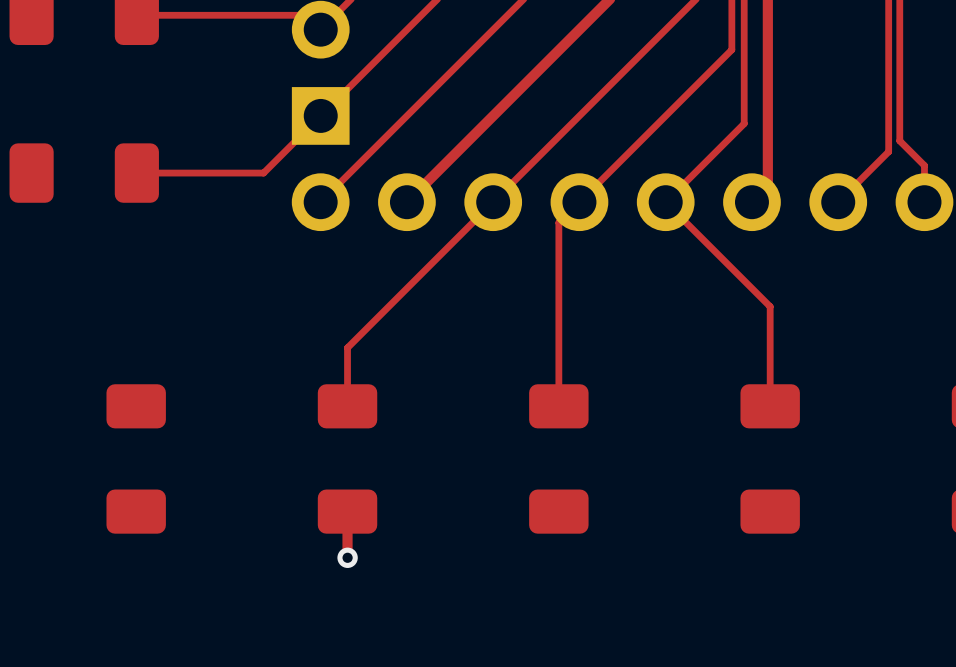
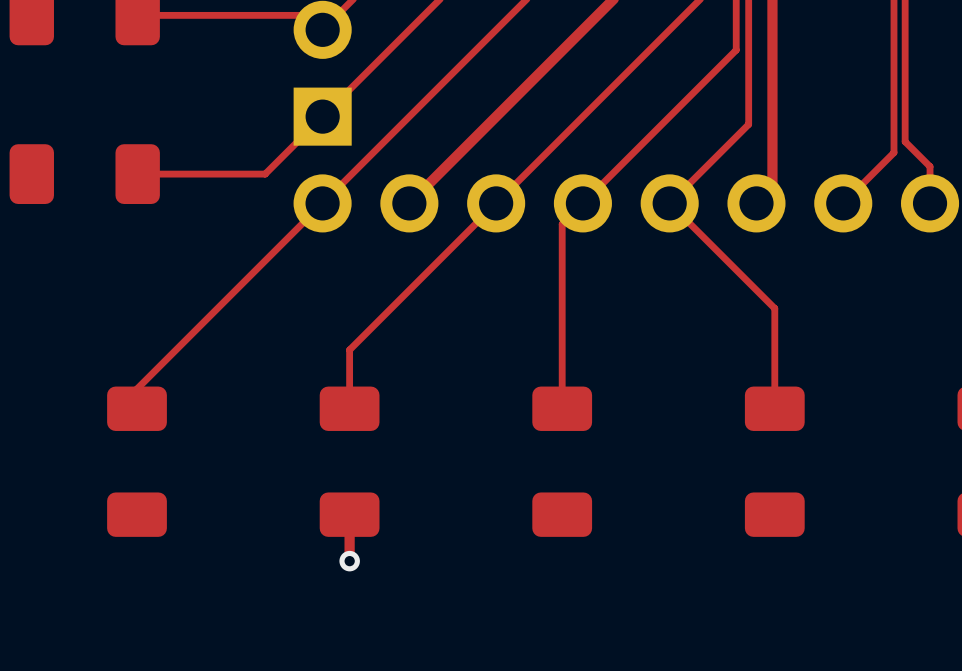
top track: none -> (322, 203) (137, 389) (137, 408)

